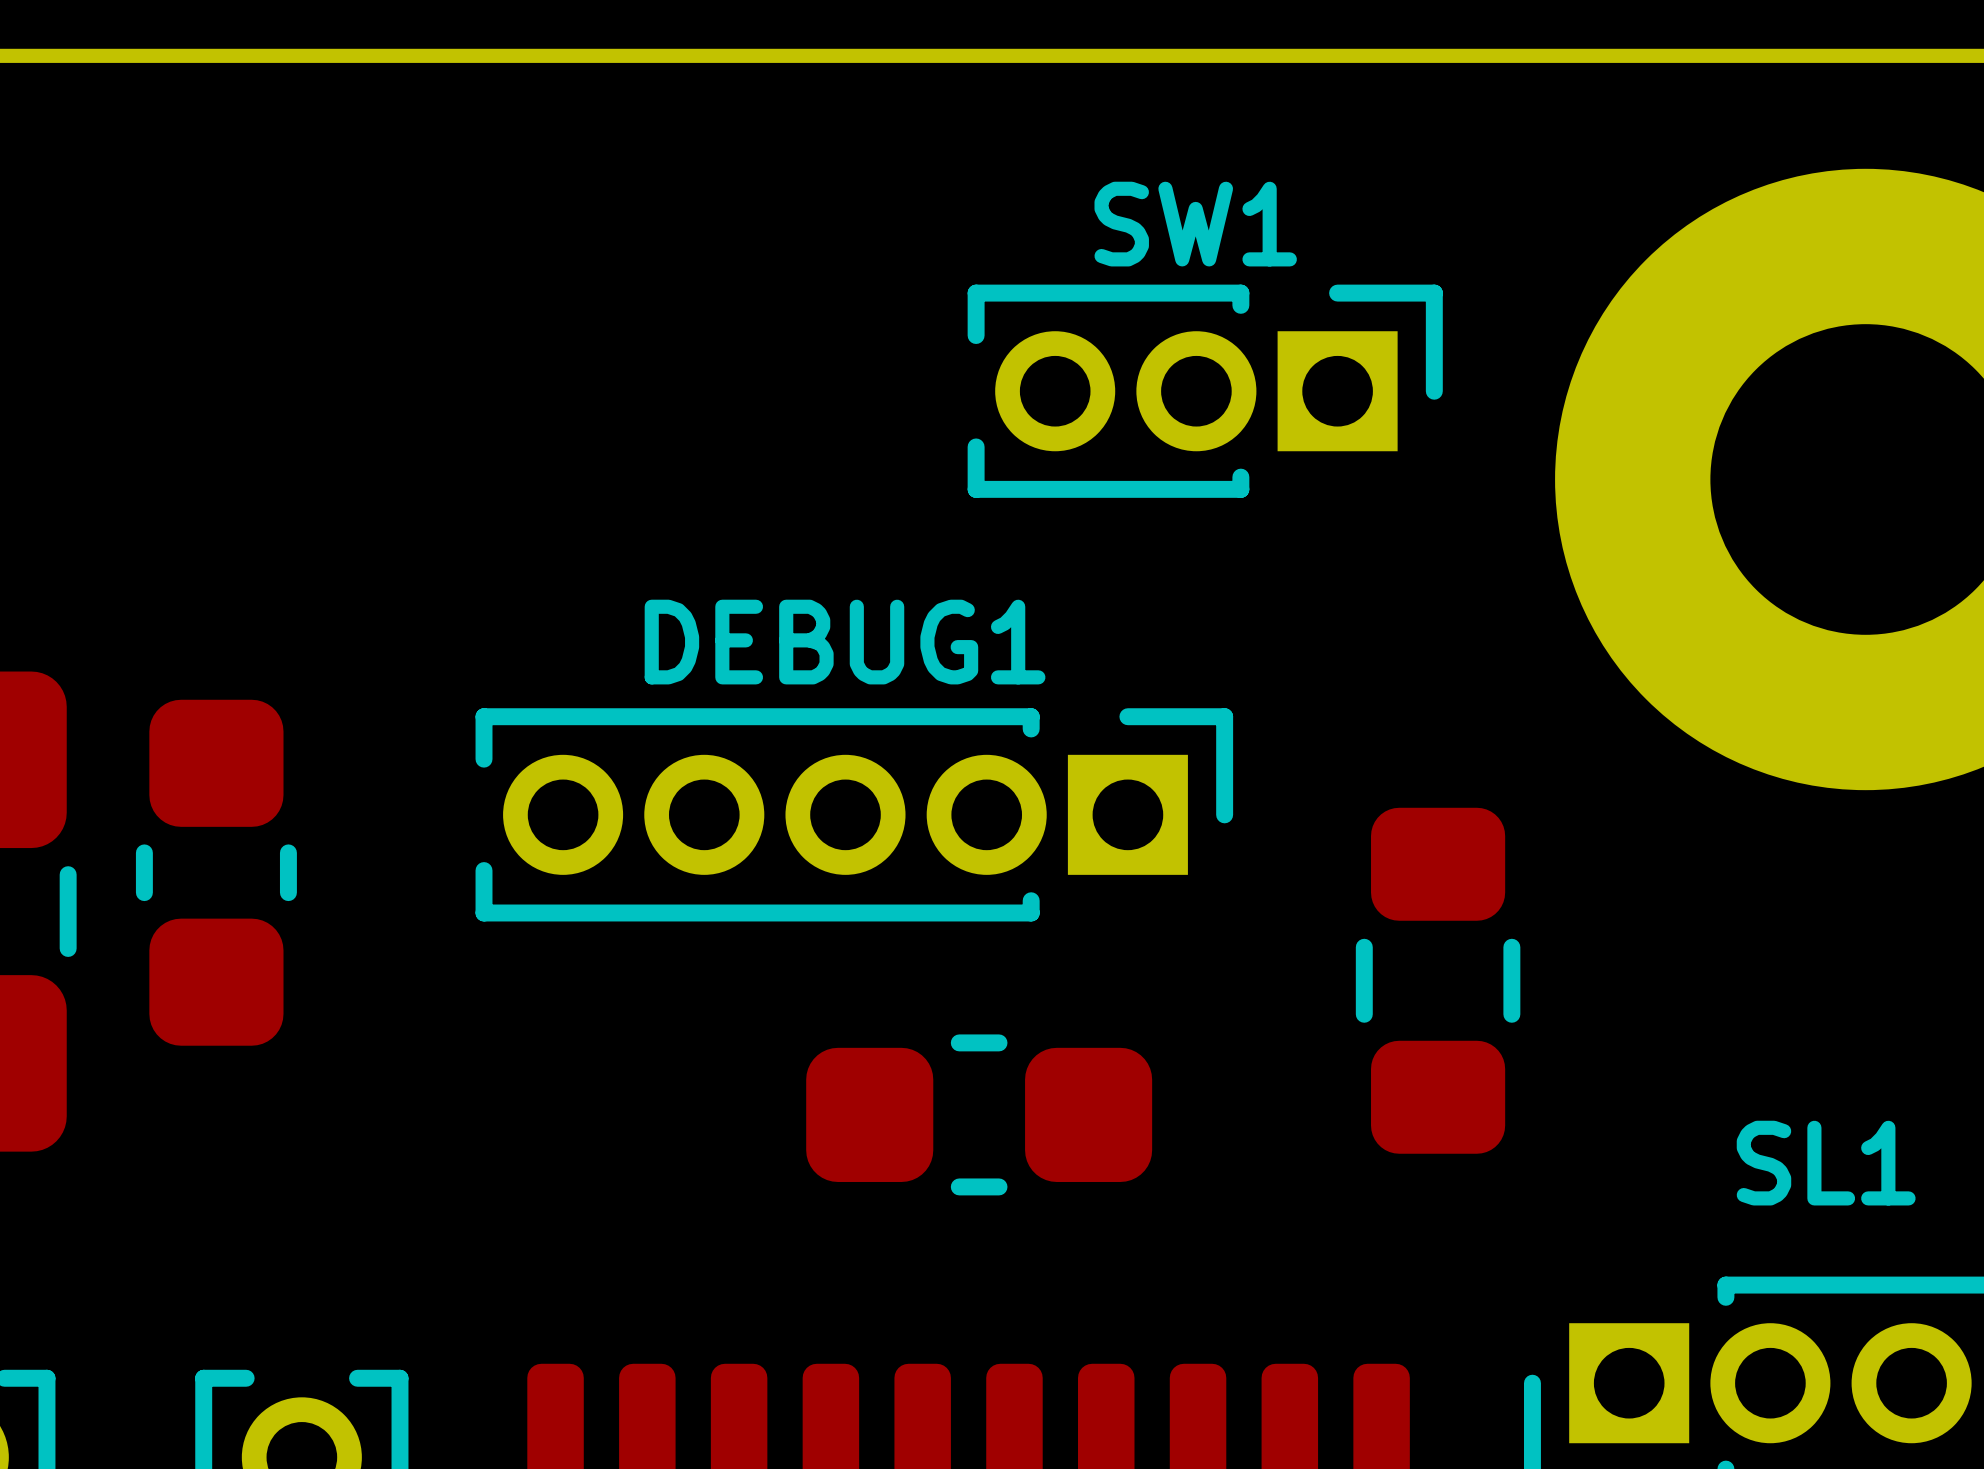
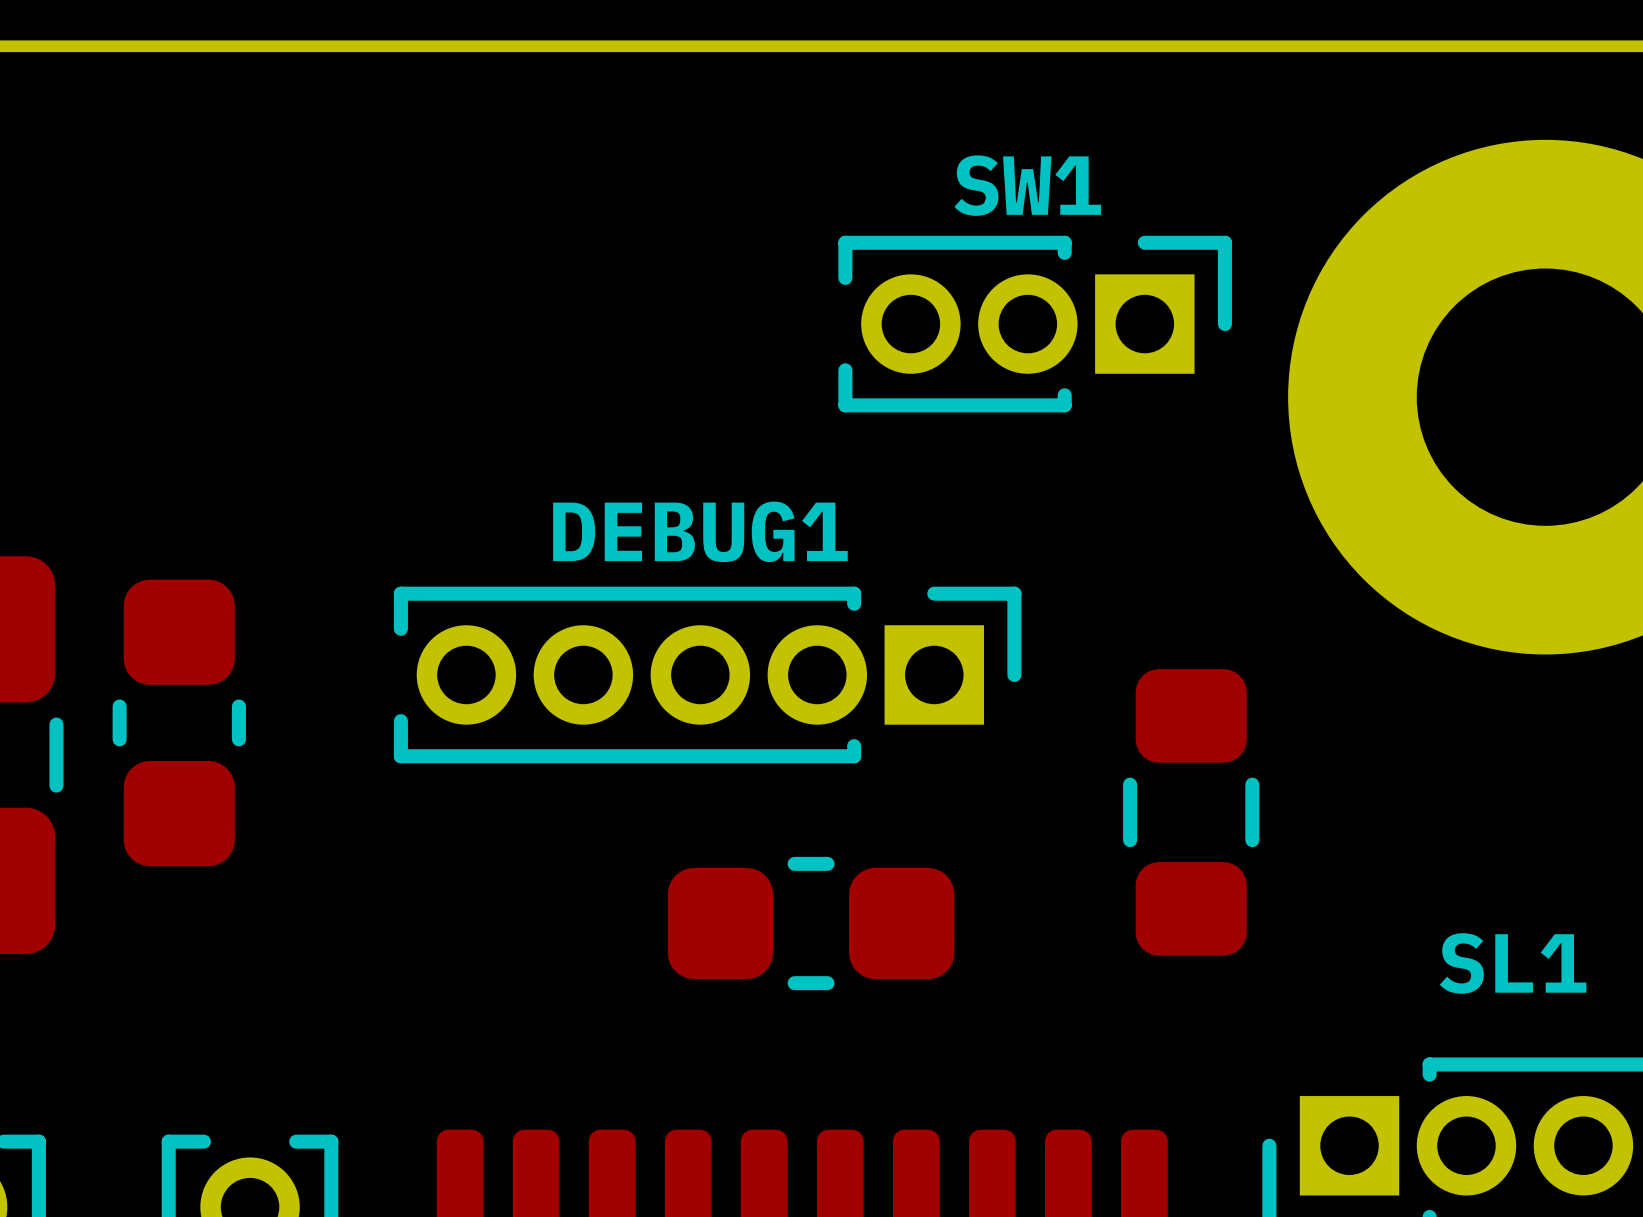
SW1 position: (1205, 391) -> (1035, 324)

